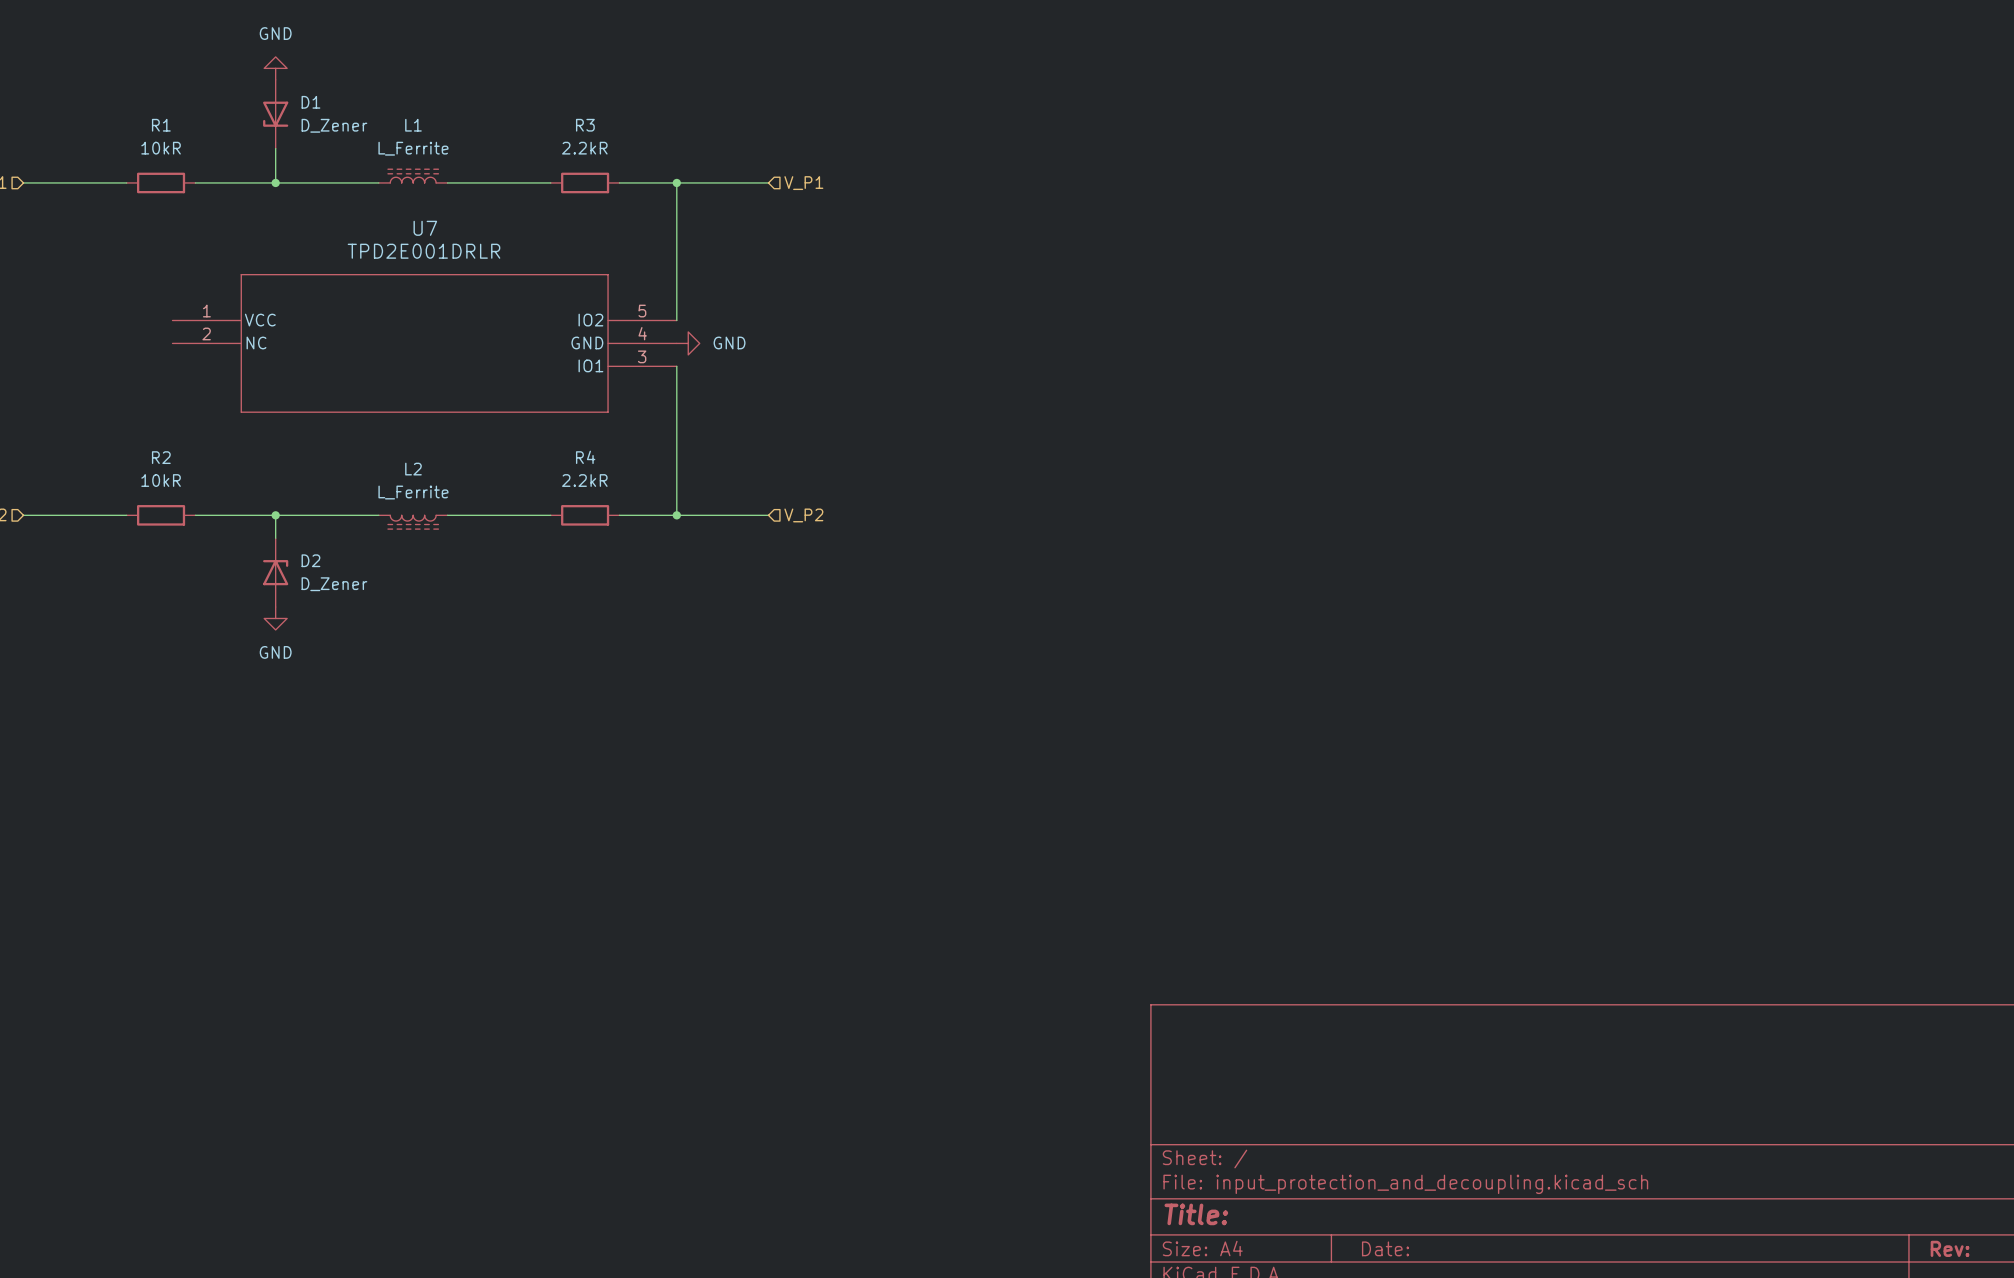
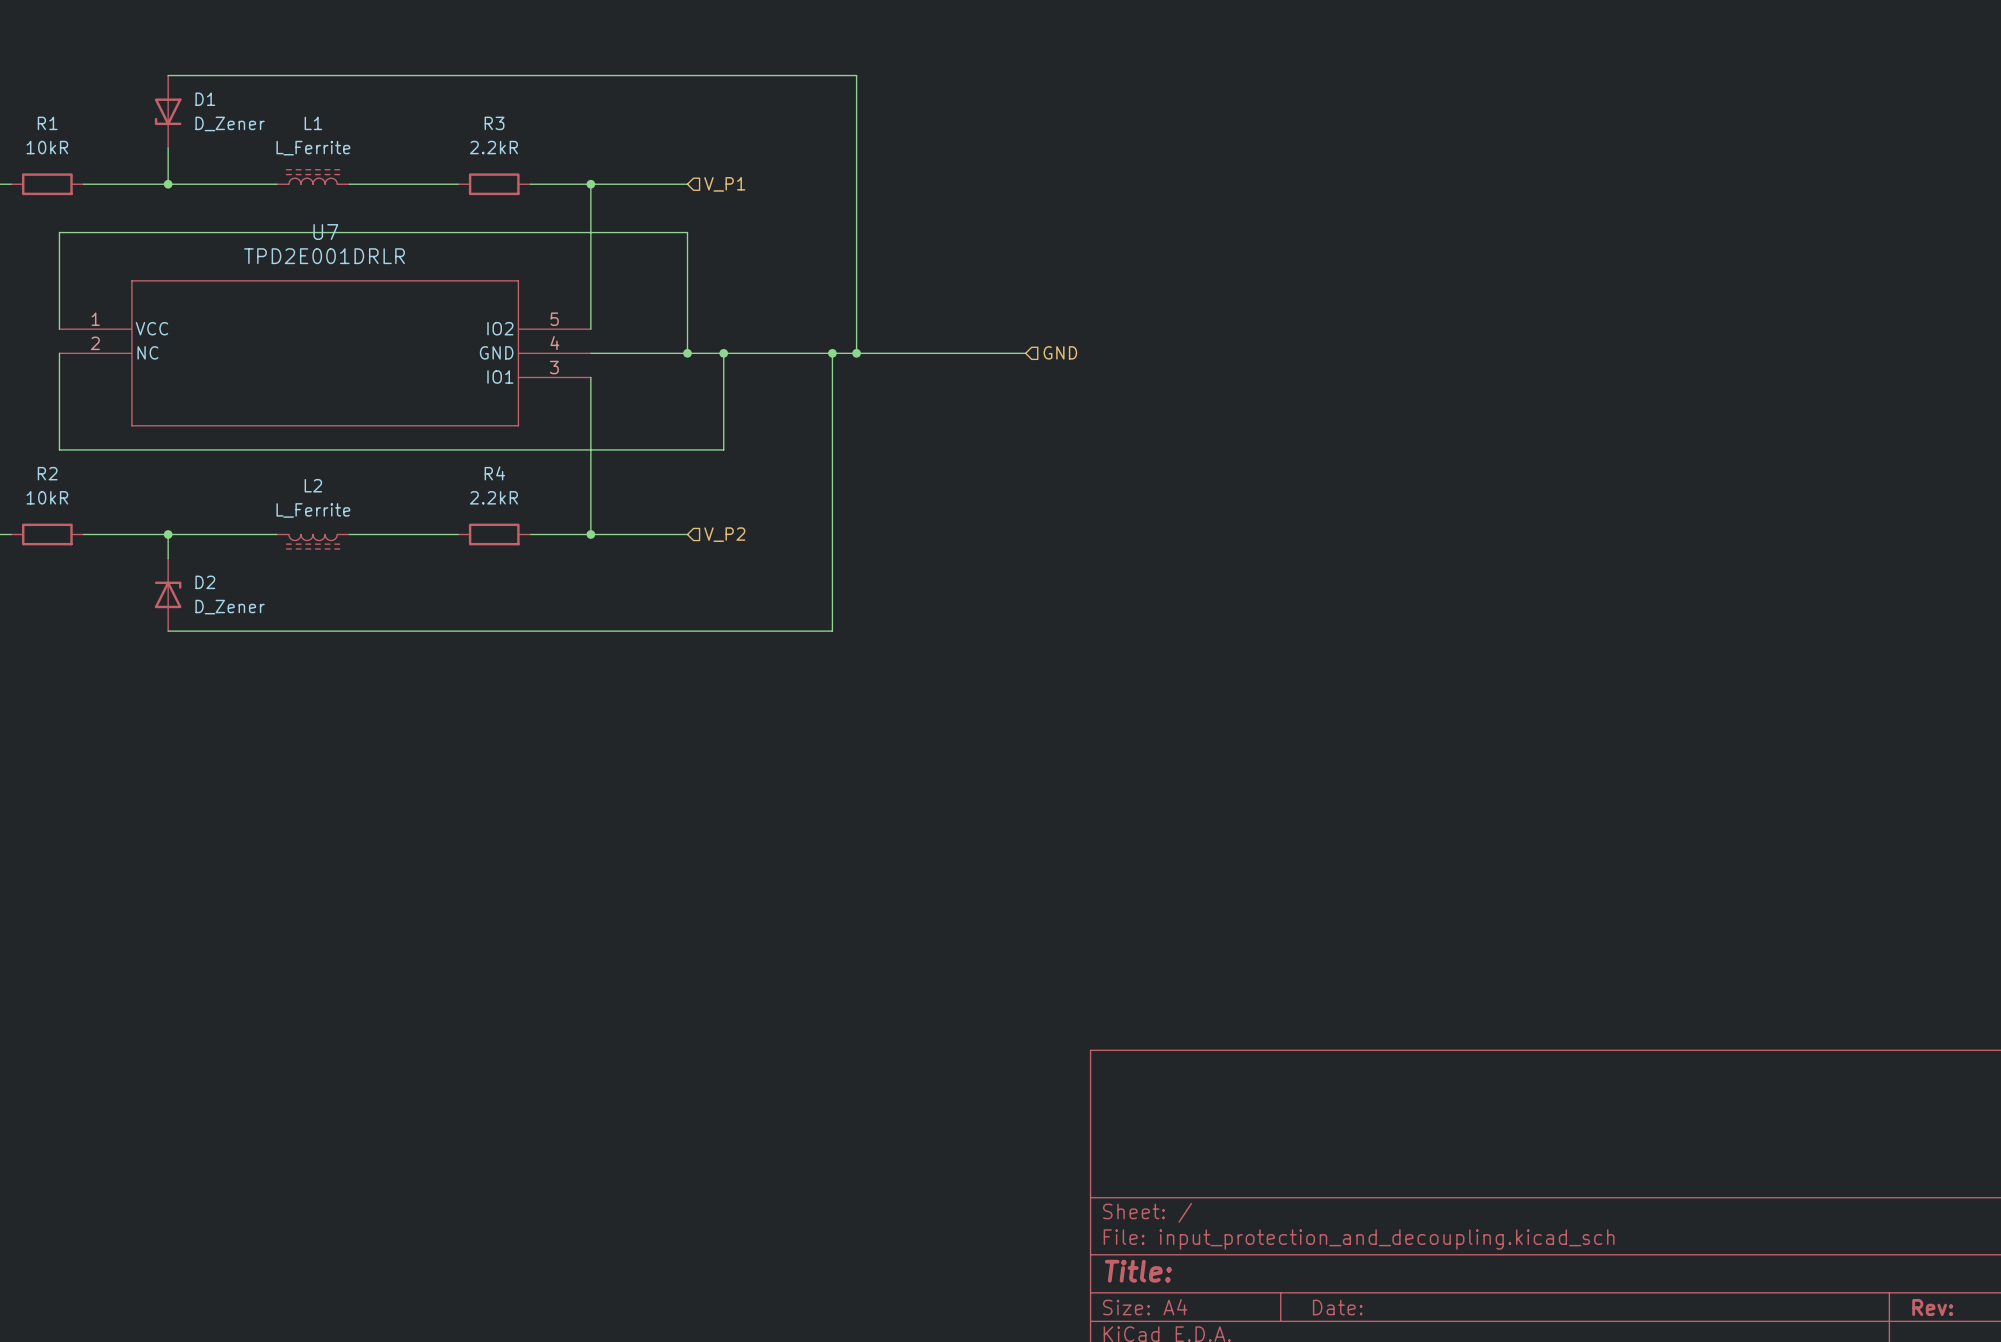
power symbol: GND (275, 68) -> none
wire: none -> (168, 75) (856, 75) (856, 353)
wire: none -> (59, 329) (59, 232) (687, 232) (687, 353)
hierarchical label: none -> GND (1060, 352)
wire: none -> (59, 353) (59, 449) (723, 449) (723, 353)
wire: none -> (590, 353) (1025, 353)
power symbol: GND (688, 343) -> none
junction: none -> (687, 353)
junction: none -> (723, 353)
wire: none -> (832, 353) (832, 631) (168, 631)
junction: none -> (832, 353)
junction: none -> (856, 353)
power symbol: GND (275, 618) -> none

